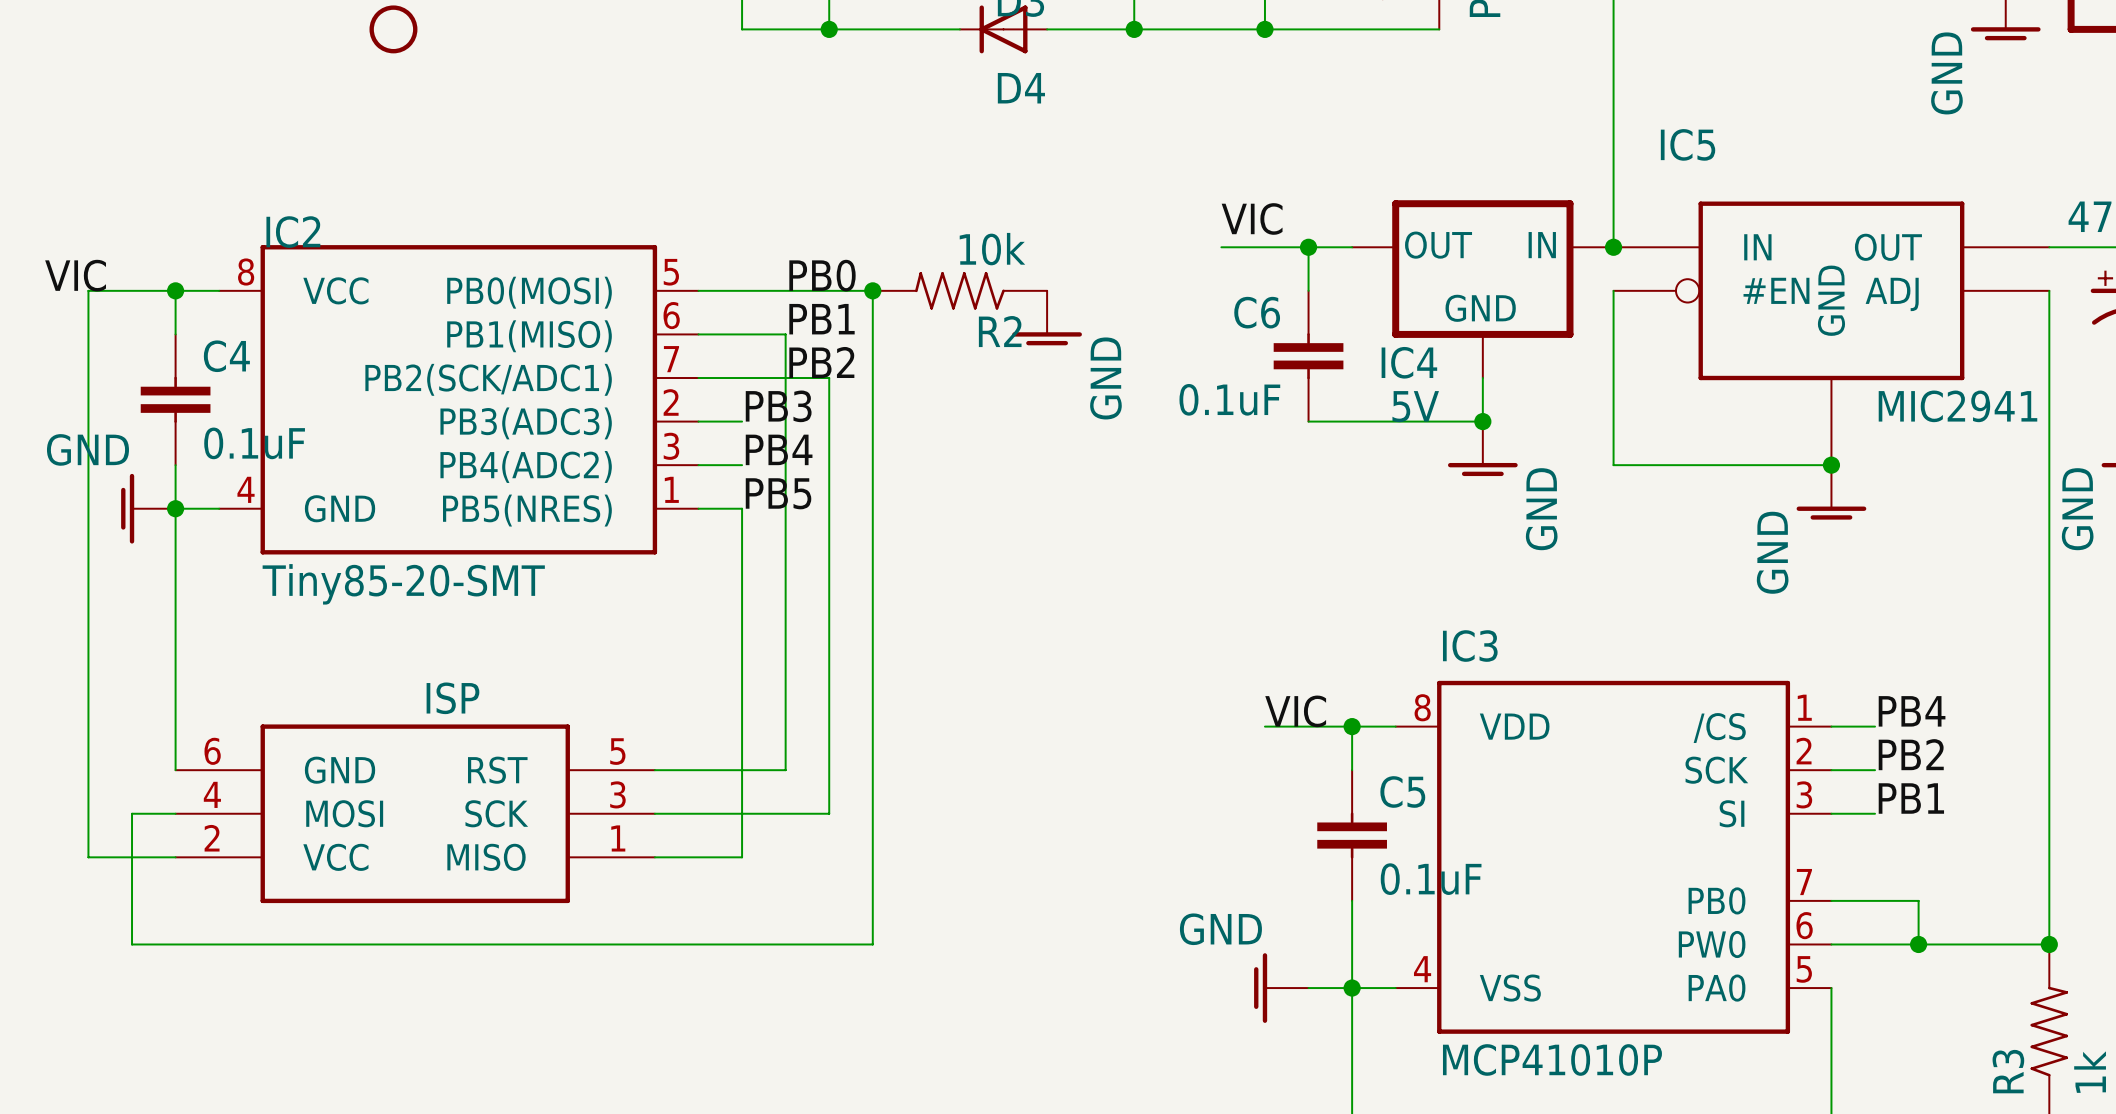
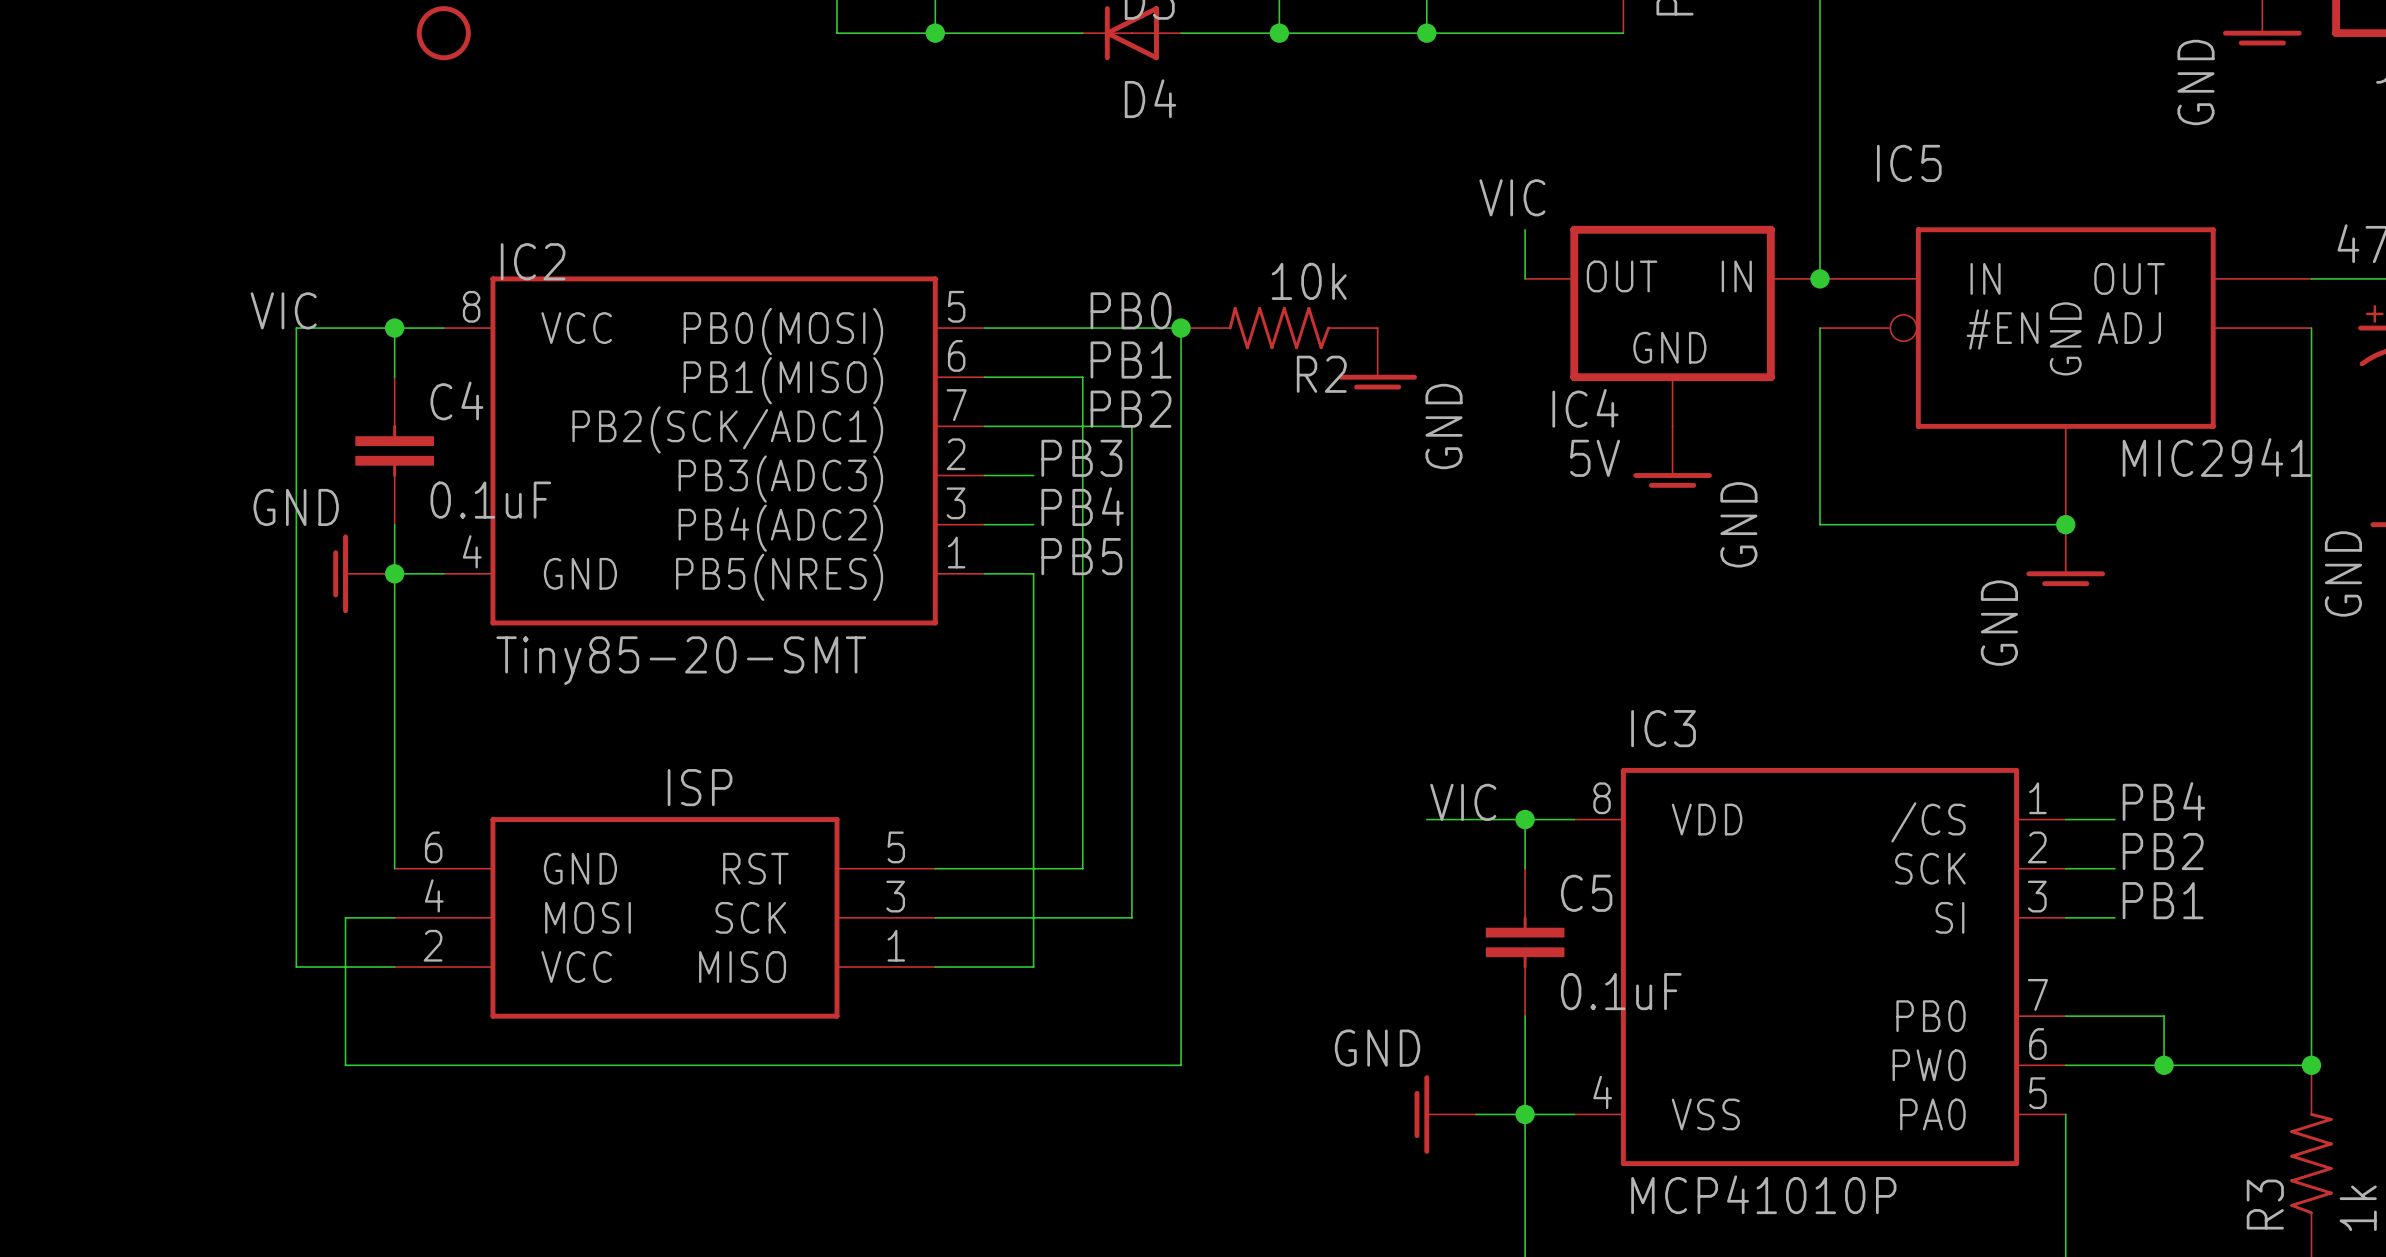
label position: VIC (1252, 218) -> VIC (1512, 197)
wire: (1221, 247) (1352, 247) -> (1525, 229) (1525, 278)
wire: (1308, 247) (1308, 290) -> none
junction: (1308, 247) -> none
label position: VIC (75, 275) -> VIC (283, 310)
label position: PB0 (822, 275) -> PB0 (1131, 310)
wire: (175, 290) (175, 334) -> (394, 328) (394, 377)
junction: (175, 290) -> none
wire: (219, 290) (88, 290) (88, 857) (175, 857) -> (443, 328) (296, 328) (296, 967) (394, 967)
junction: none -> (394, 328)
wire: (698, 290) (872, 290) (872, 944) -> (984, 328) (1181, 328) (1181, 1065) (984, 1065)
junction: (872, 290) -> none
R2 position: (959, 290) -> (1279, 328)
junction: none -> (1181, 328)
power symbol: GND (1047, 318) -> none
power symbol: none -> GND (1377, 358)
label position: PB1 (822, 319) -> PB1 (1131, 360)
wire: (698, 334) (785, 334) (785, 770) (654, 770) -> (984, 377) (1082, 377) (1082, 868) (935, 868)
C6: 0.1uF (1308, 356) -> none
label position: PB2 (821, 362) -> PB2 (1131, 409)
wire: (698, 378) (829, 378) (829, 813) (654, 813) -> (984, 426) (1131, 426) (1131, 917) (935, 917)
wire: (1482, 378) (1482, 421) (1308, 421) -> none
C4 position: (175, 399) -> (394, 450)
IC2 position: (458, 399) -> (714, 450)
label position: PB3 (778, 406) -> PB3 (1081, 458)
wire: (698, 421) (742, 421) -> (984, 475) (1033, 475)
junction: (1482, 421) -> none
power symbol position: GND (1482, 448) -> GND (1672, 457)
label position: PB4 (779, 449) -> PB4 (1082, 506)
wire: (175, 465) (175, 770) -> (394, 524) (394, 868)
wire: (698, 465) (742, 465) -> (984, 524) (1033, 524)
label position: PB5 (778, 493) -> PB5 (1081, 556)
power symbol position: GND (148, 508) -> GND (363, 573)
wire: (175, 508) (219, 508) -> (394, 573) (443, 573)
junction: (175, 508) -> none
junction: none -> (394, 573)
wire: (698, 508) (742, 508) (742, 857) (654, 857) -> (984, 573) (1033, 573) (1033, 967) (935, 967)
wire: (175, 813) (132, 813) (132, 944) (306, 944) -> (394, 917) (345, 917) (345, 1065)
ISP position: (415, 813) -> (664, 917)

